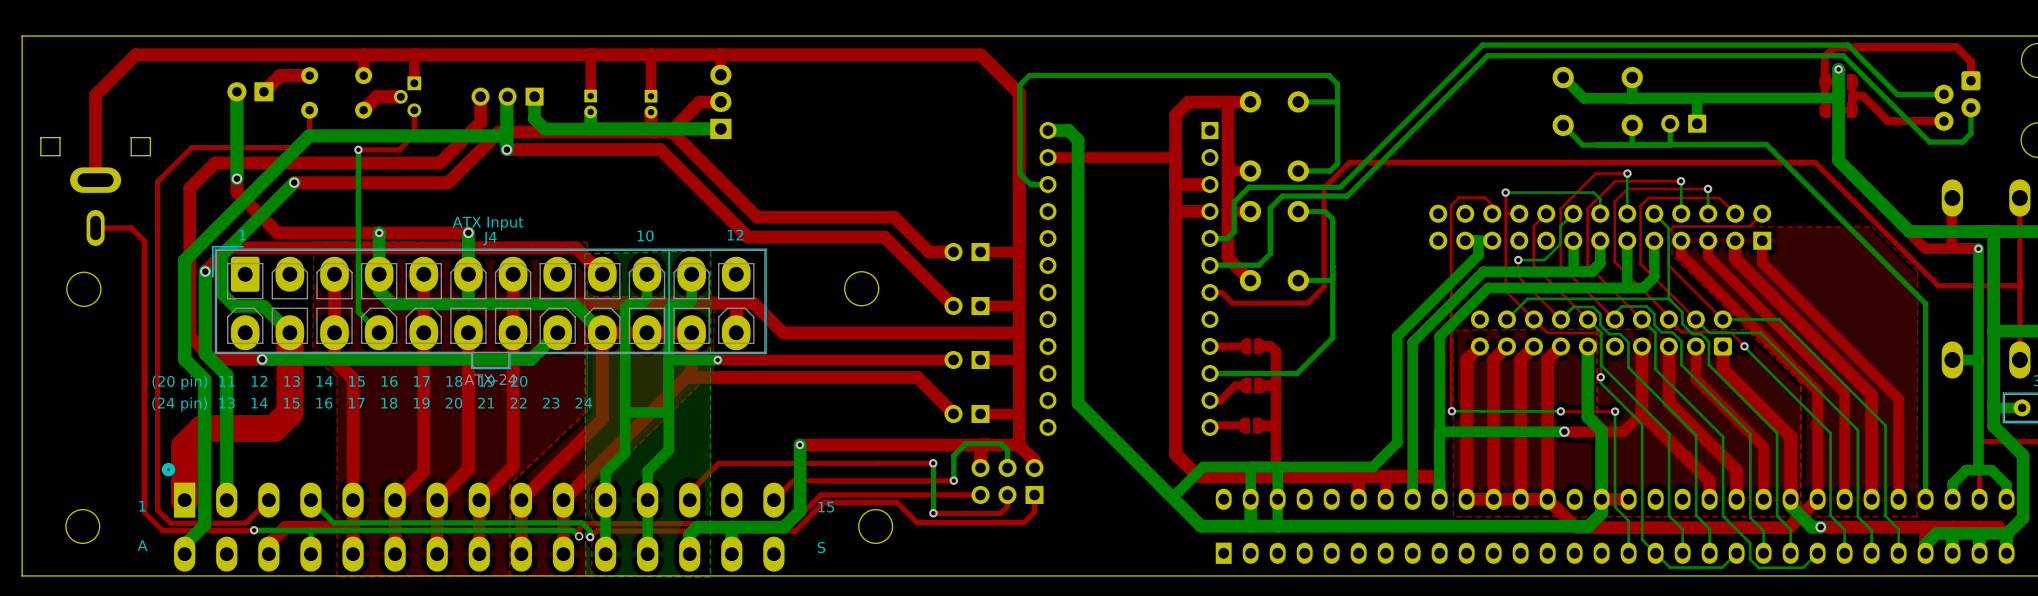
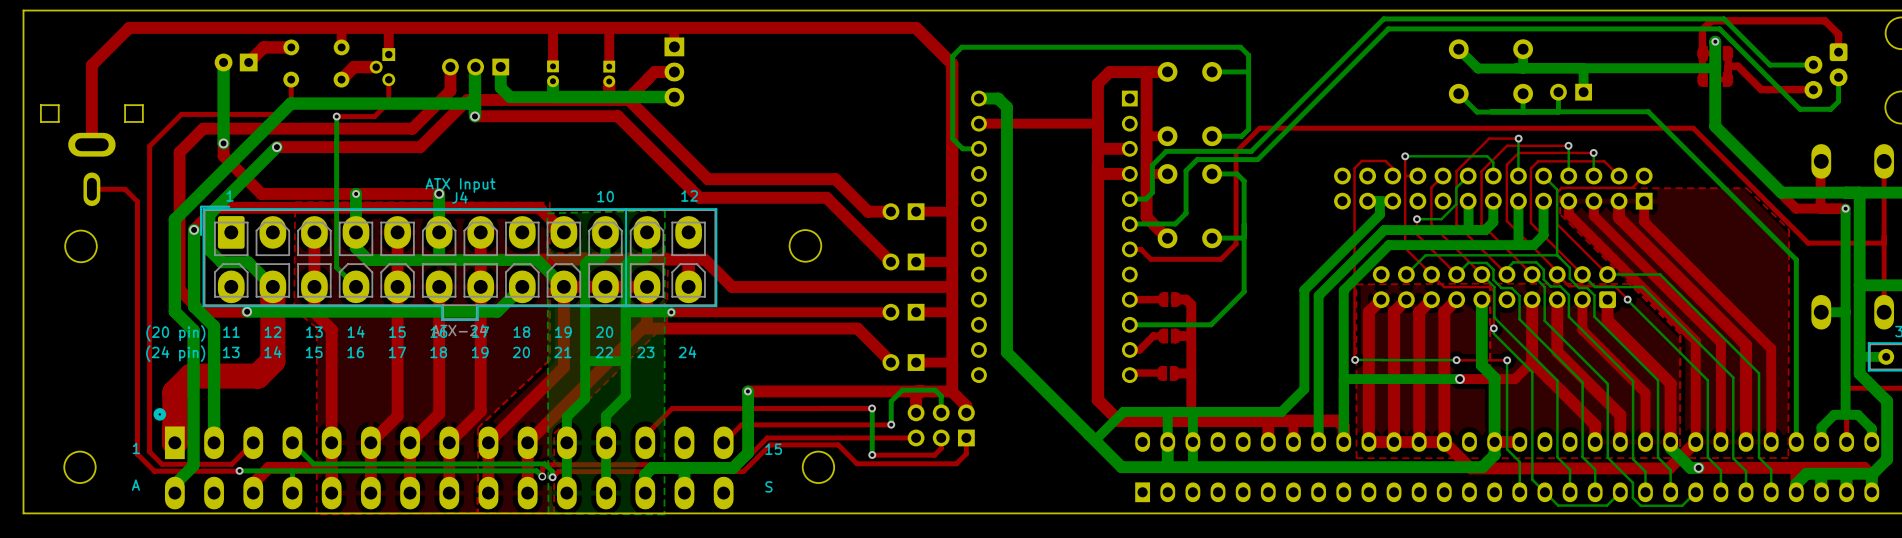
part rotation: 0° (720, 101) -> 180° (674, 72)

